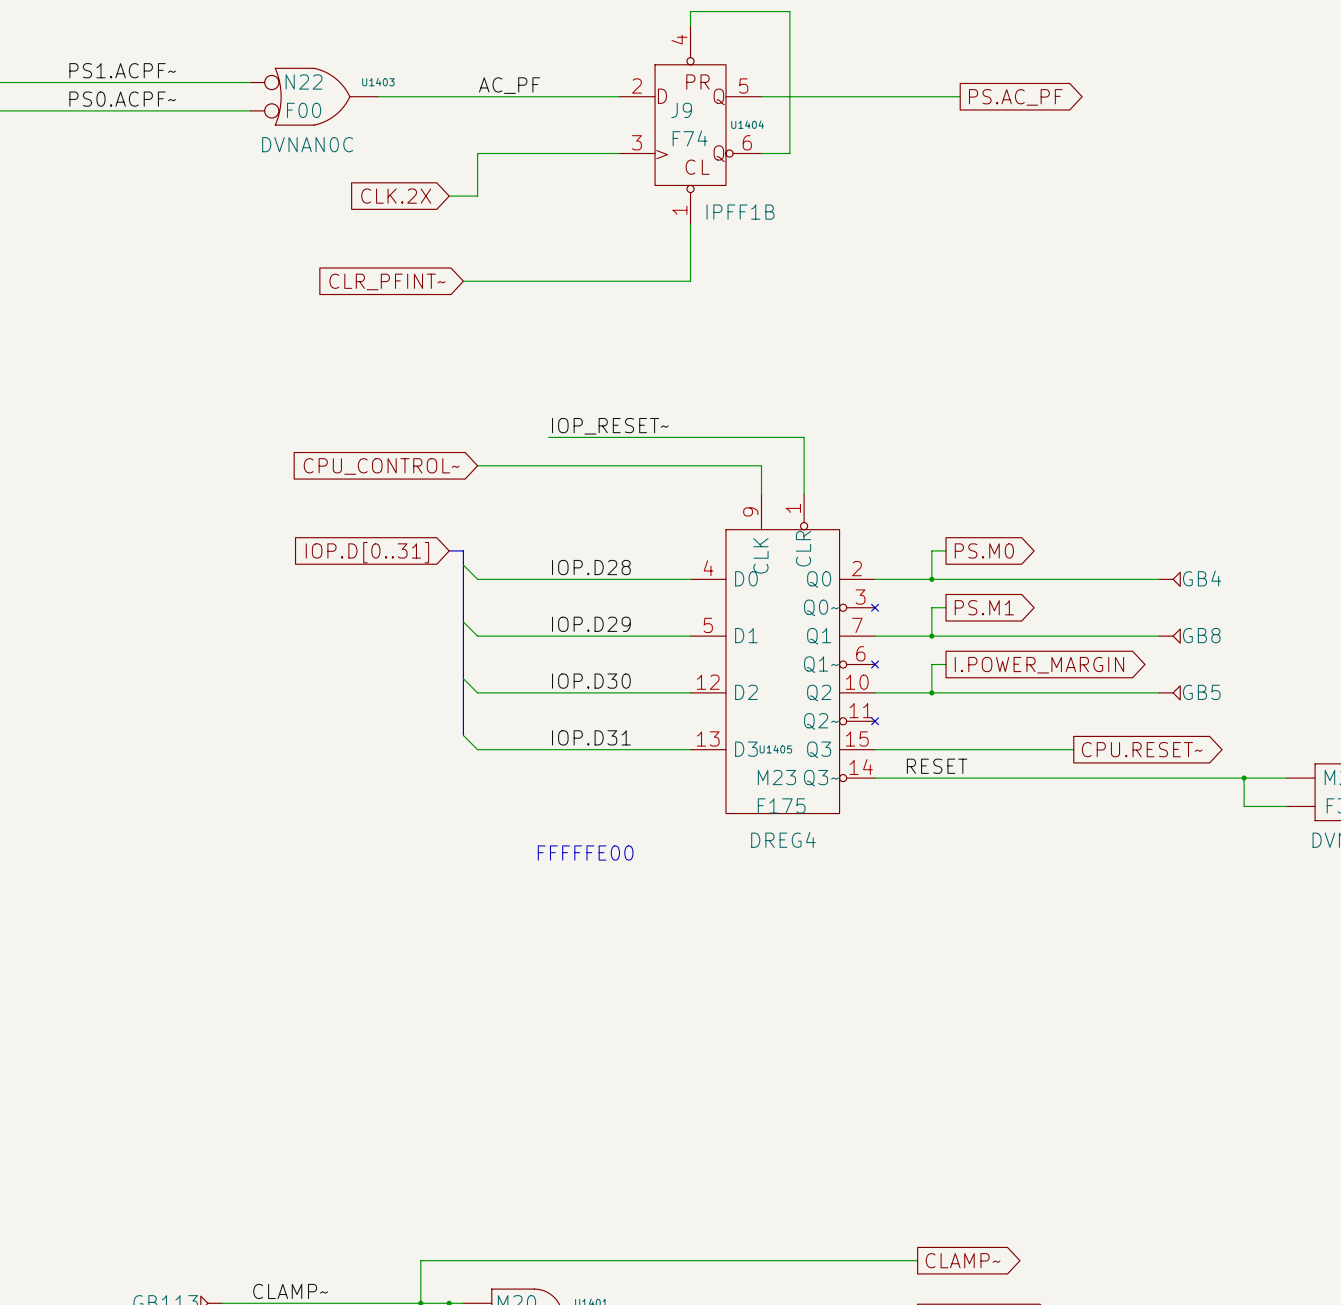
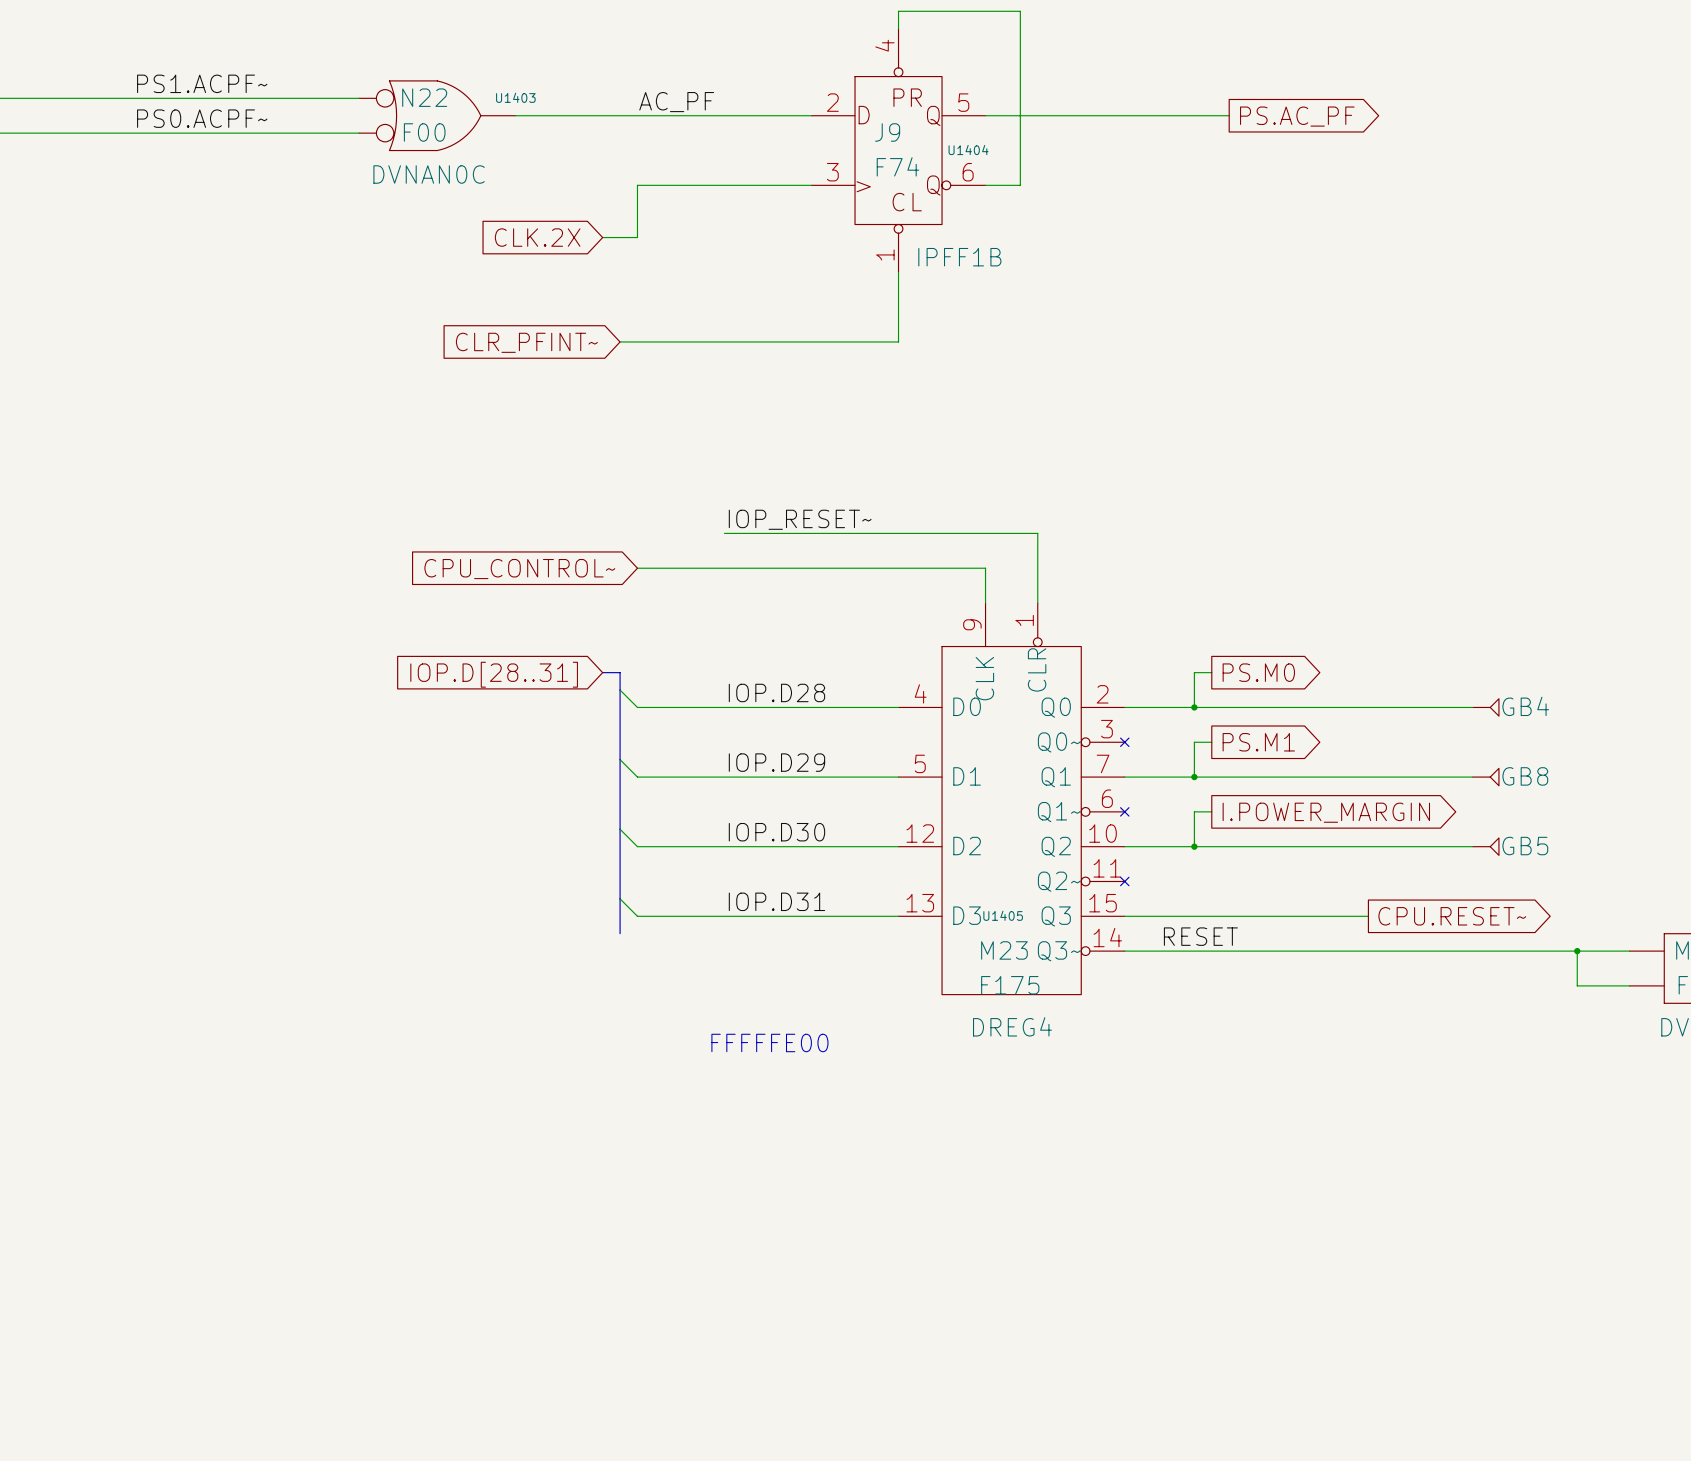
global label: IOP.D[0..31] (367, 552) -> IOP.D[28..31] (494, 674)
bus: none -> (620, 898) (620, 933)

